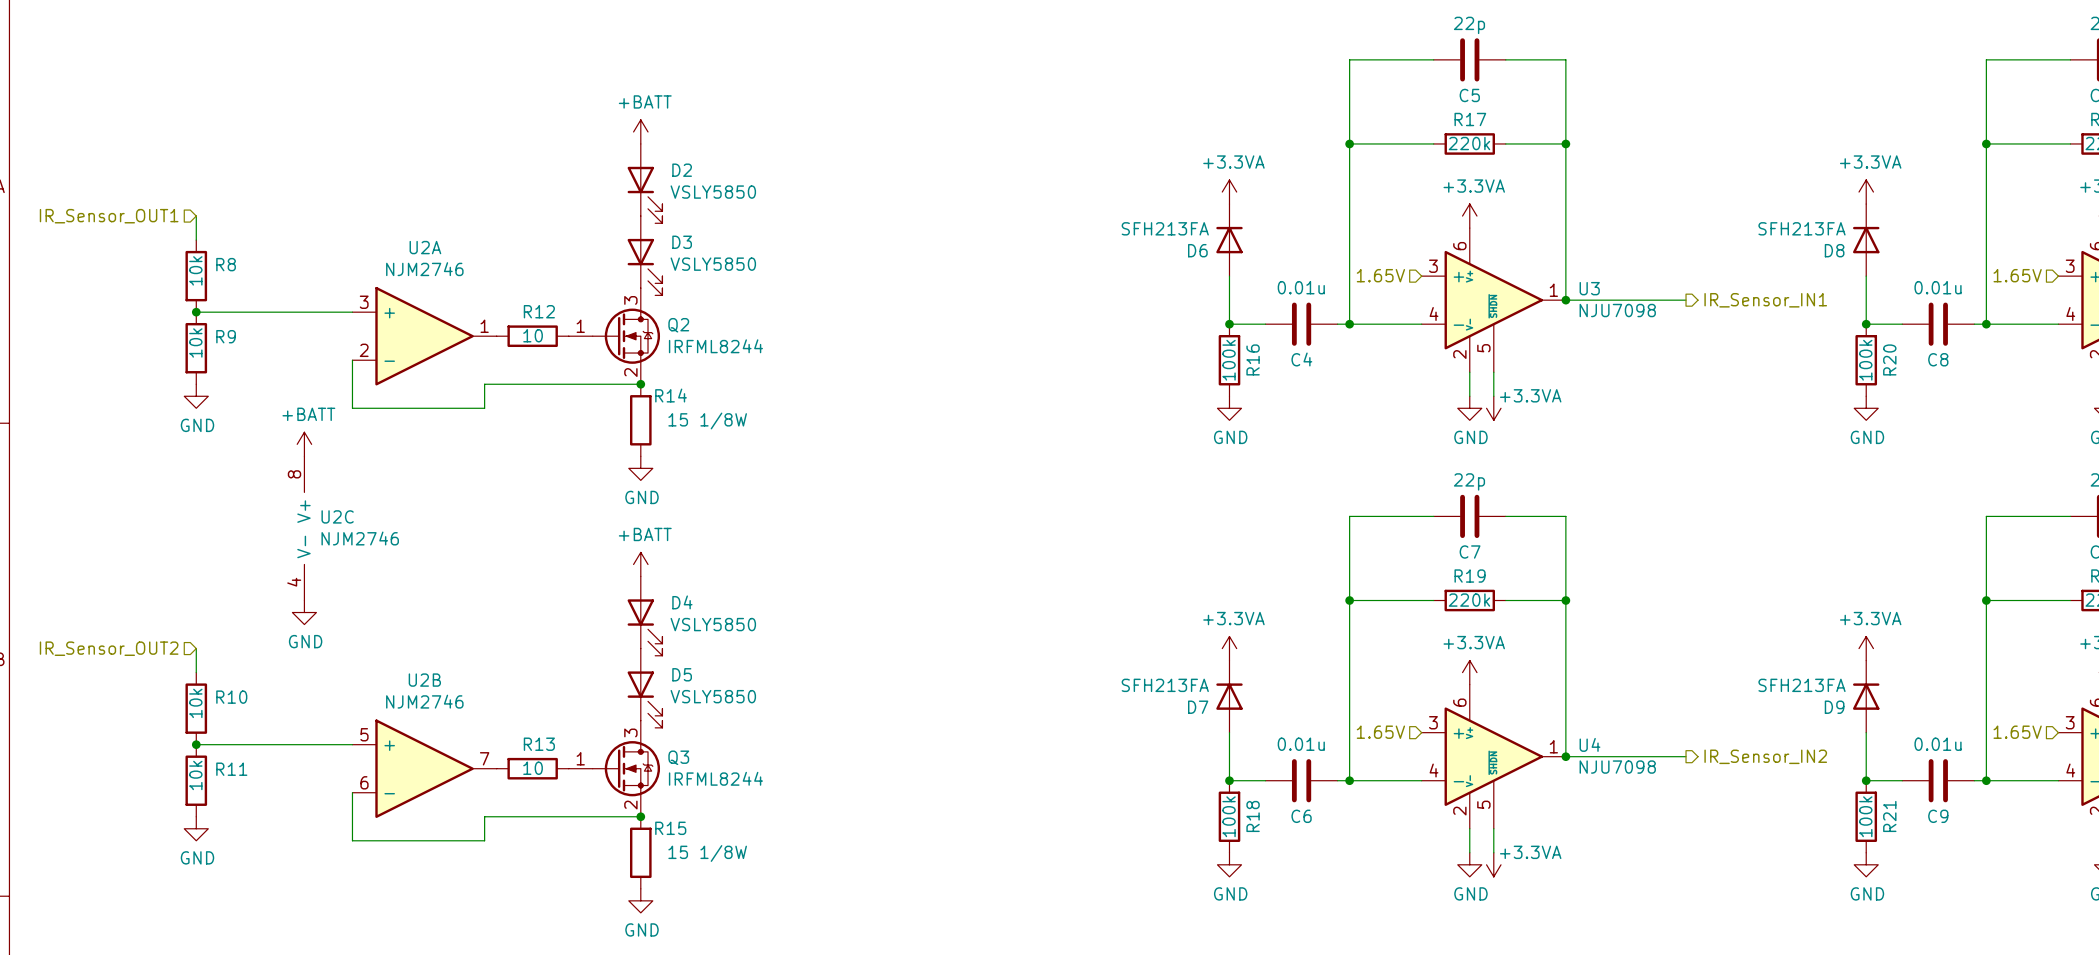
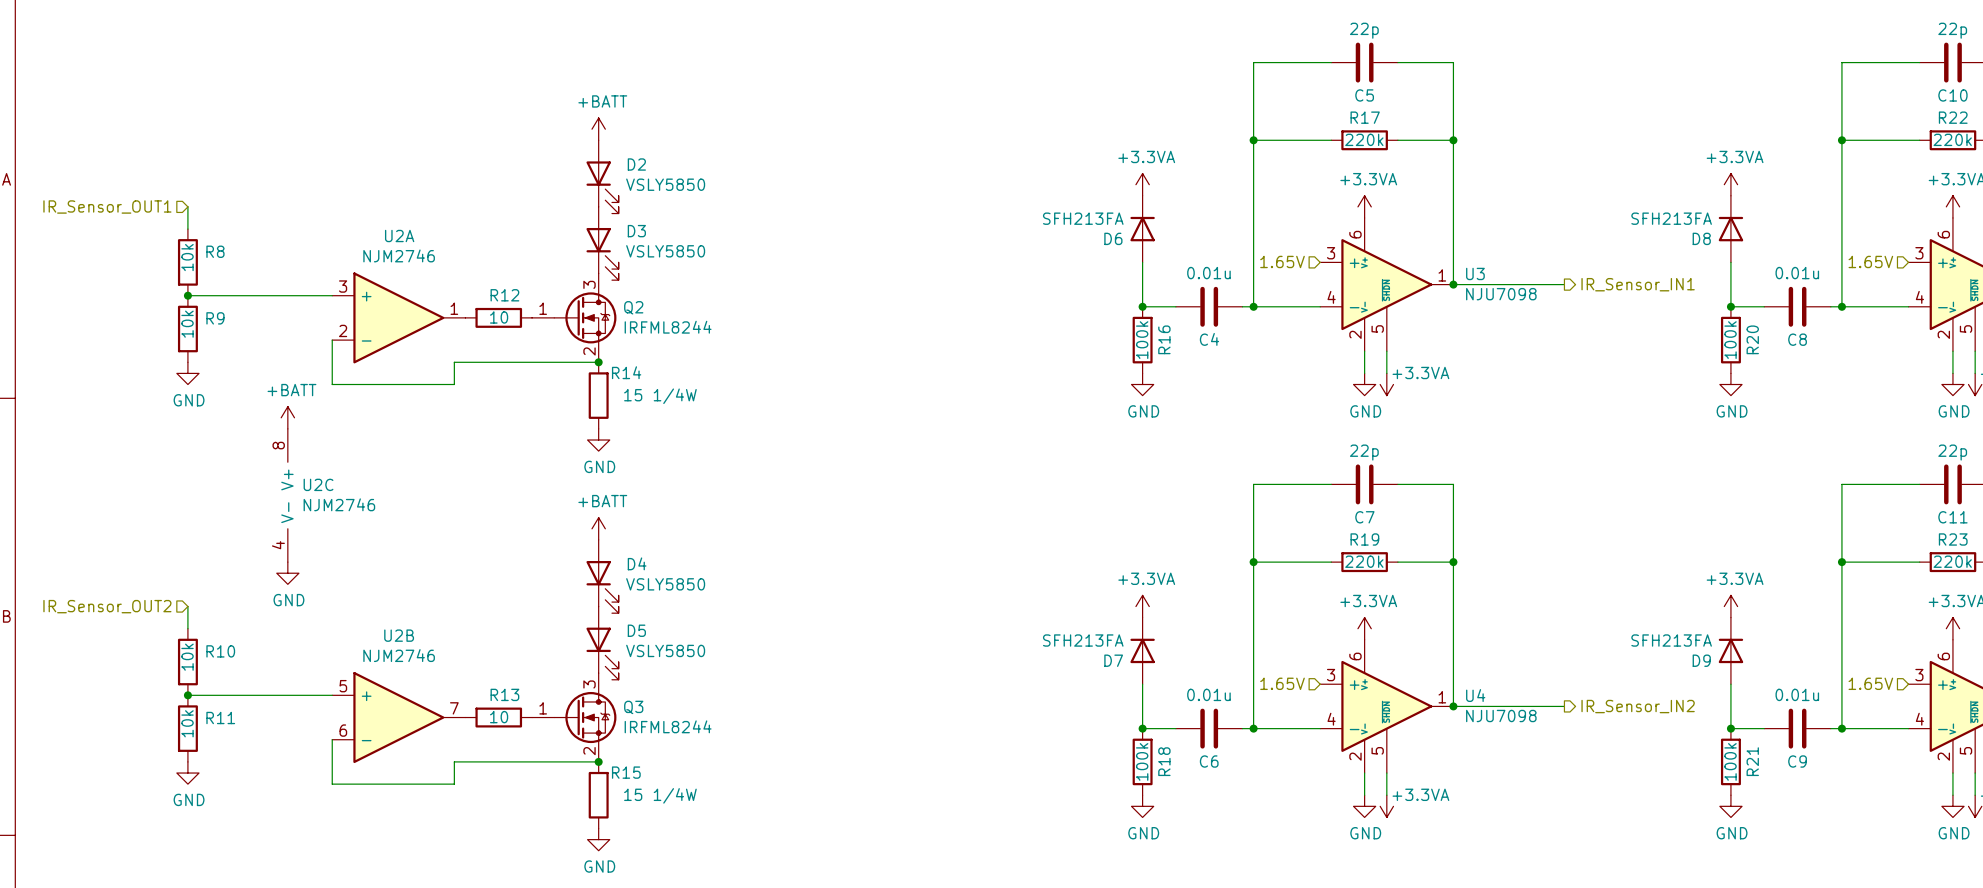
R14 value: 15 1/8W (707, 420) -> 15 1/4W (660, 396)
R15 value: 15 1/8W (707, 853) -> 15 1/4W (660, 795)

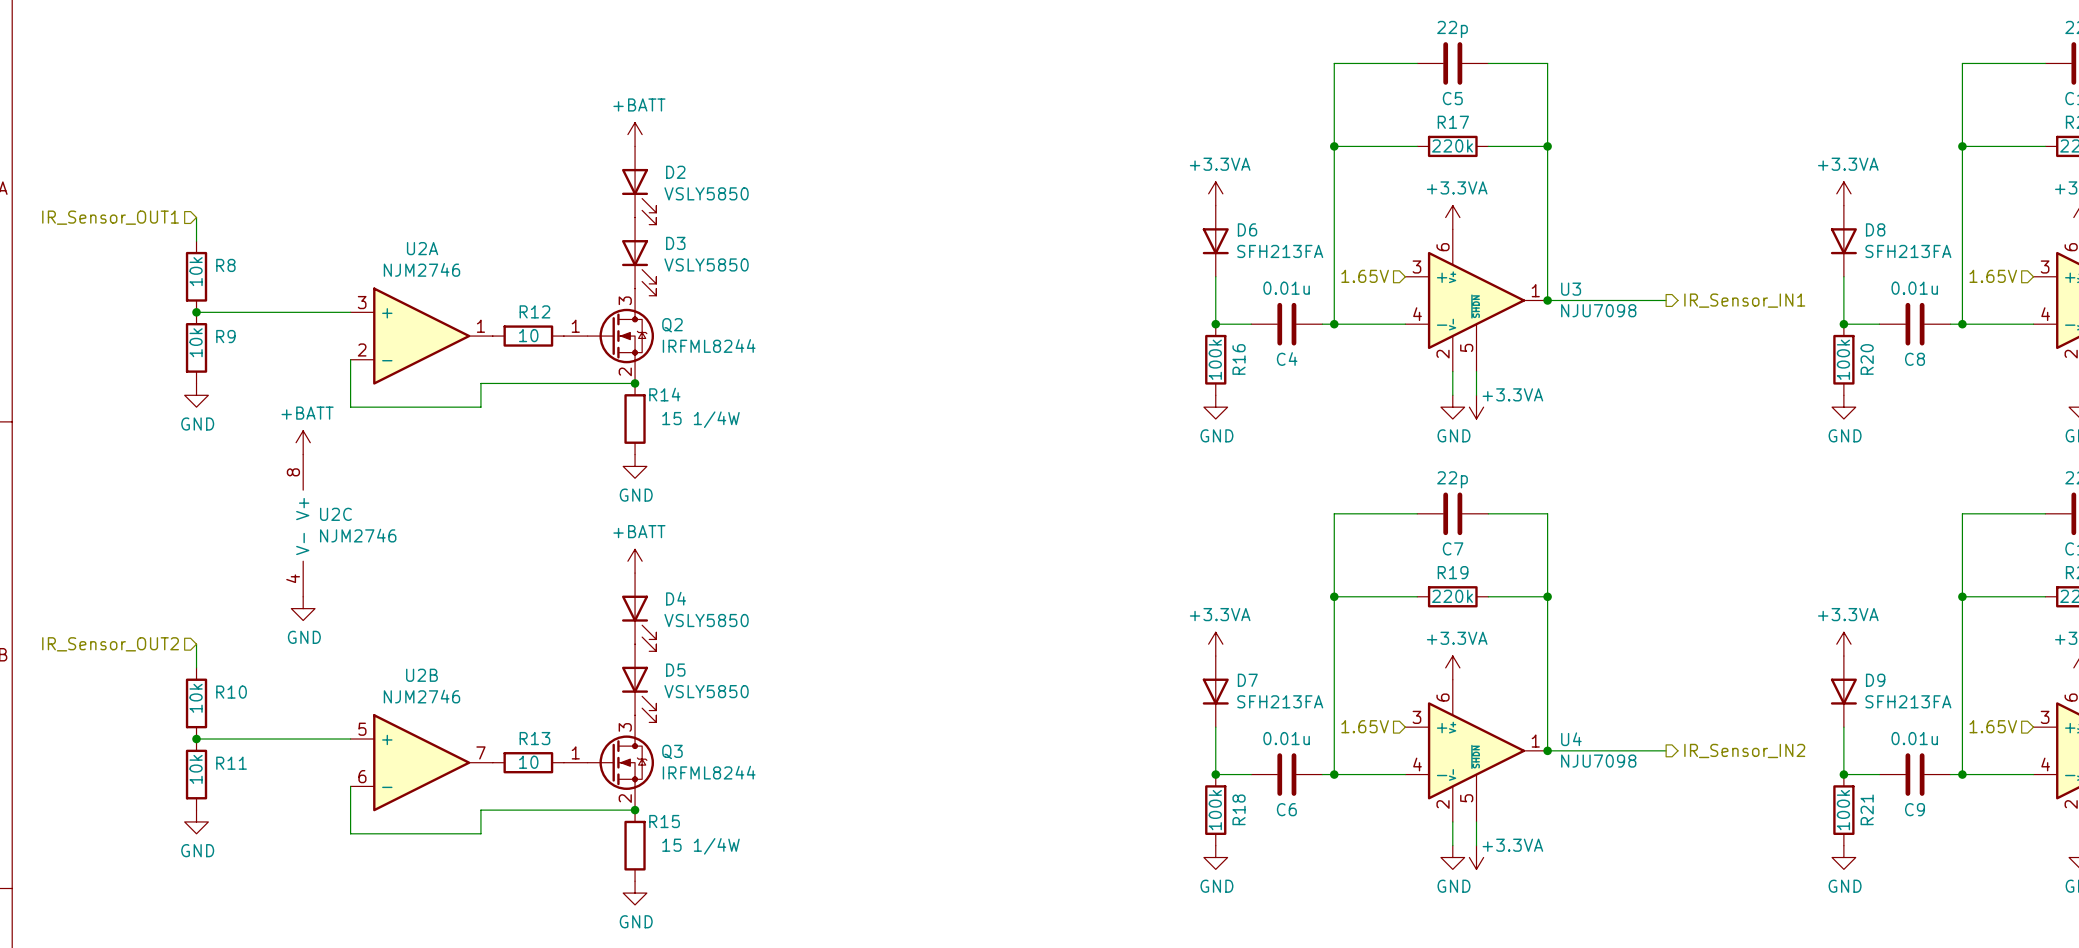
D6 rotation: 0° (1142, 229) -> 180° (1215, 241)
D8 rotation: 0° (1730, 229) -> 180° (1843, 241)
D7 rotation: 0° (1142, 650) -> 180° (1215, 691)
D9 rotation: 0° (1730, 650) -> 180° (1843, 691)

